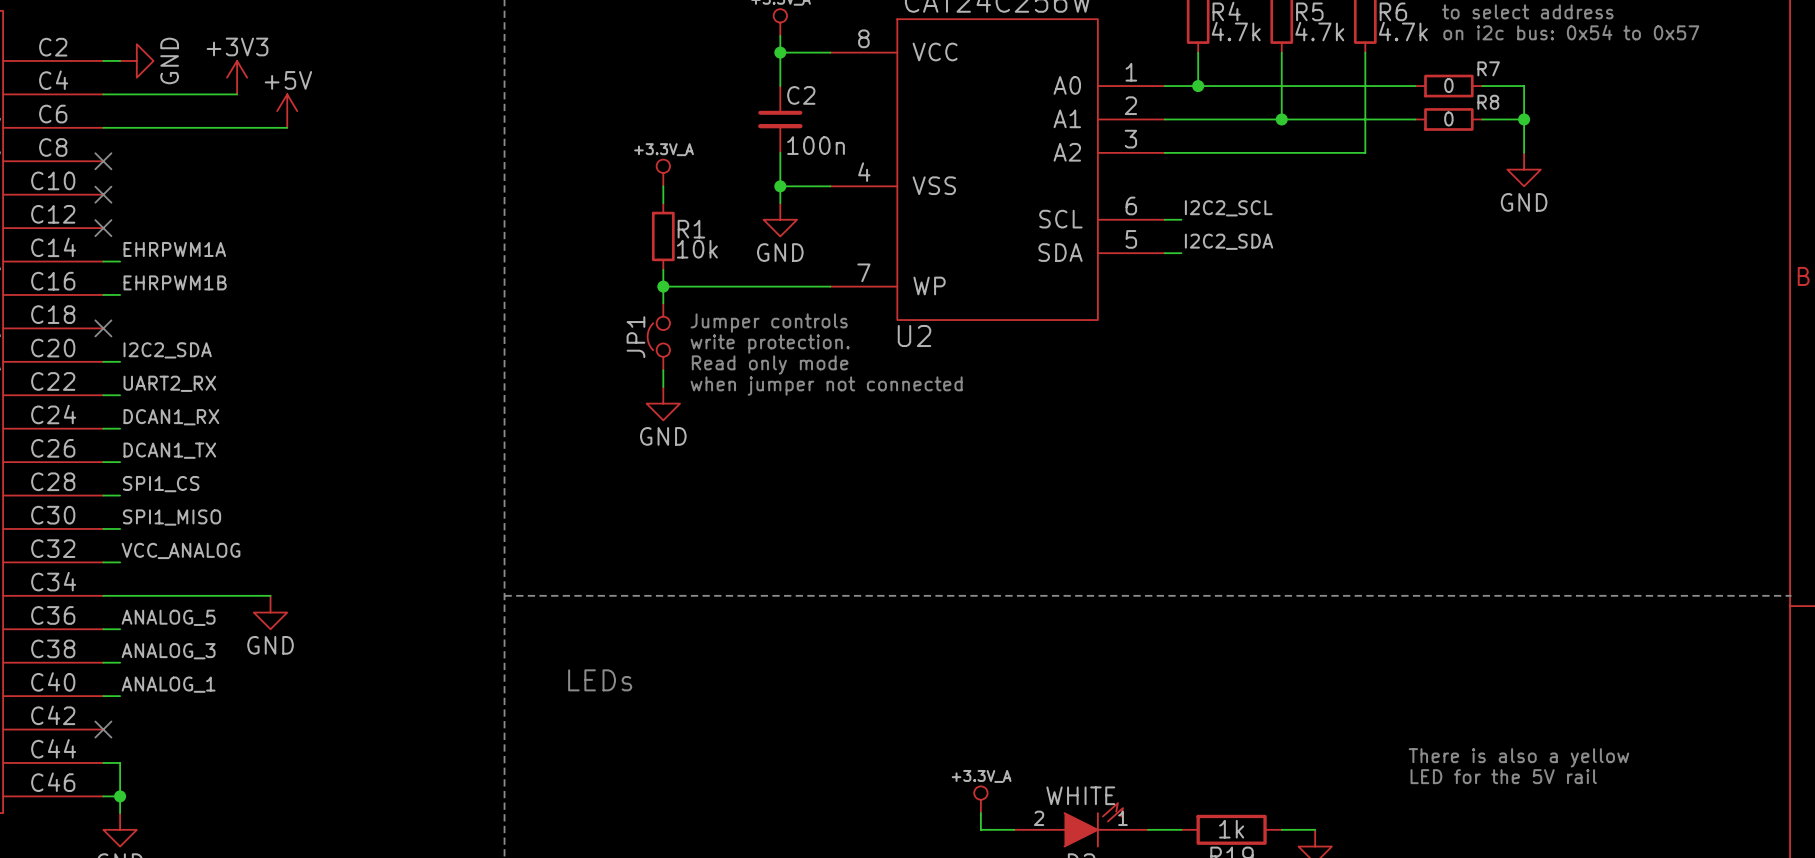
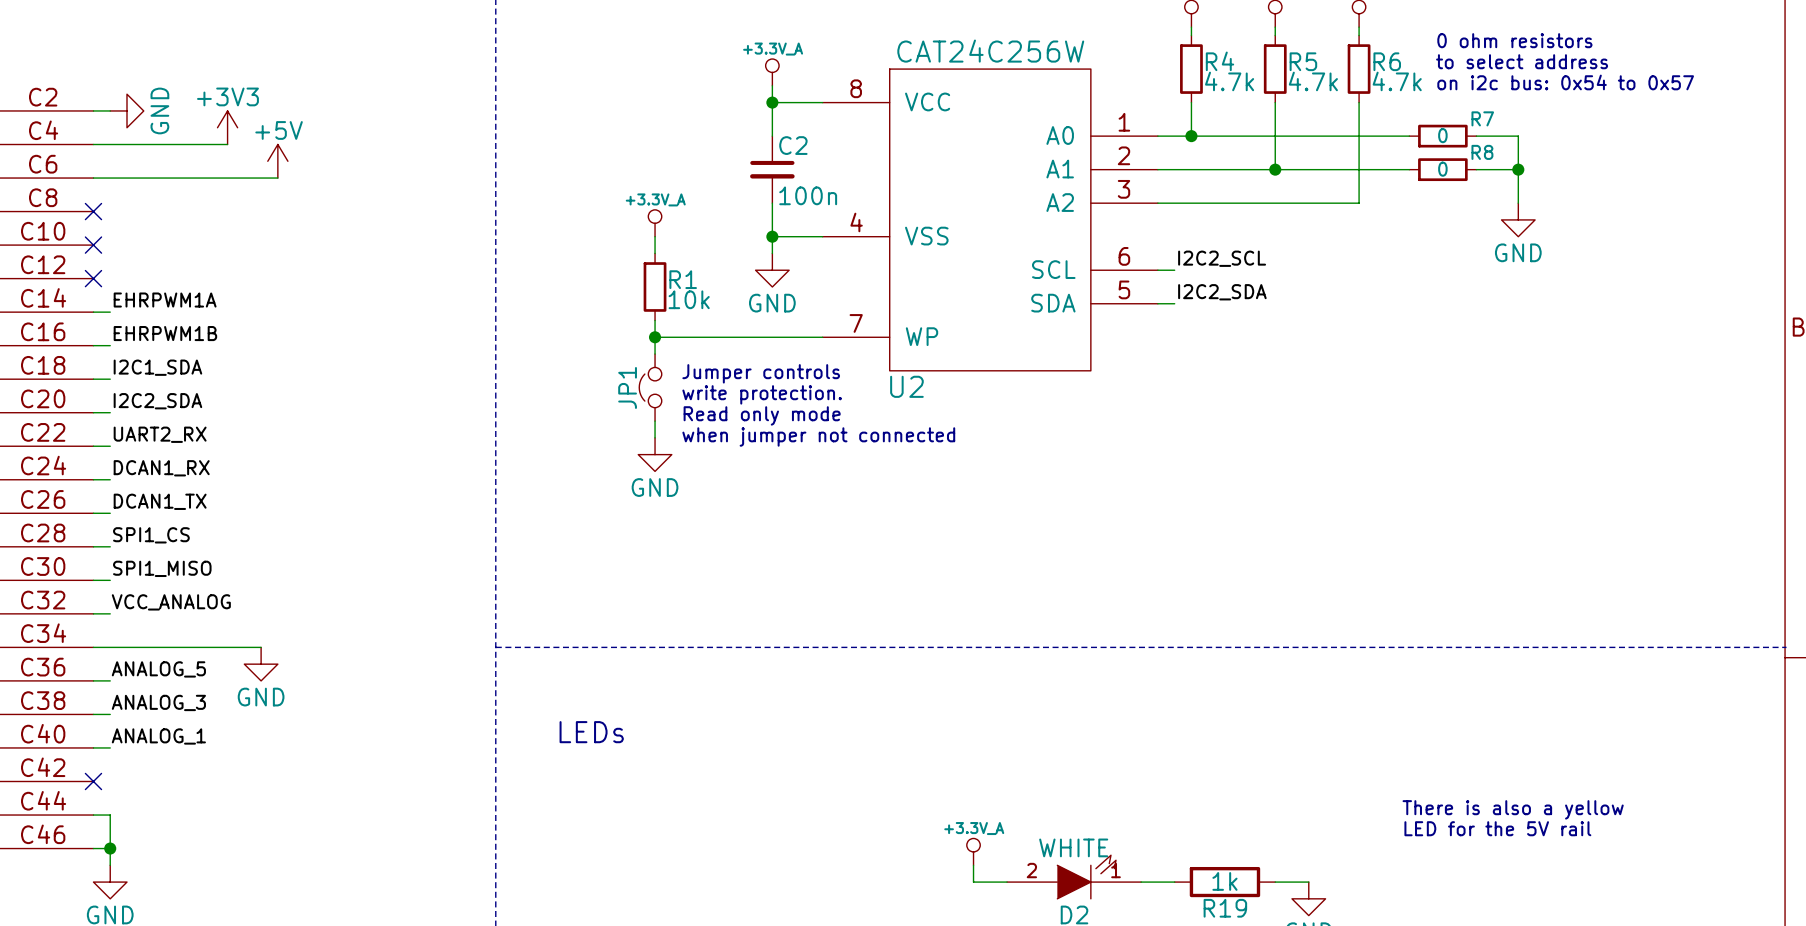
label: none -> I2C1_SDA (157, 367)
wire: none -> (93, 379) (110, 379)
no-connect mark: (103, 328) -> none

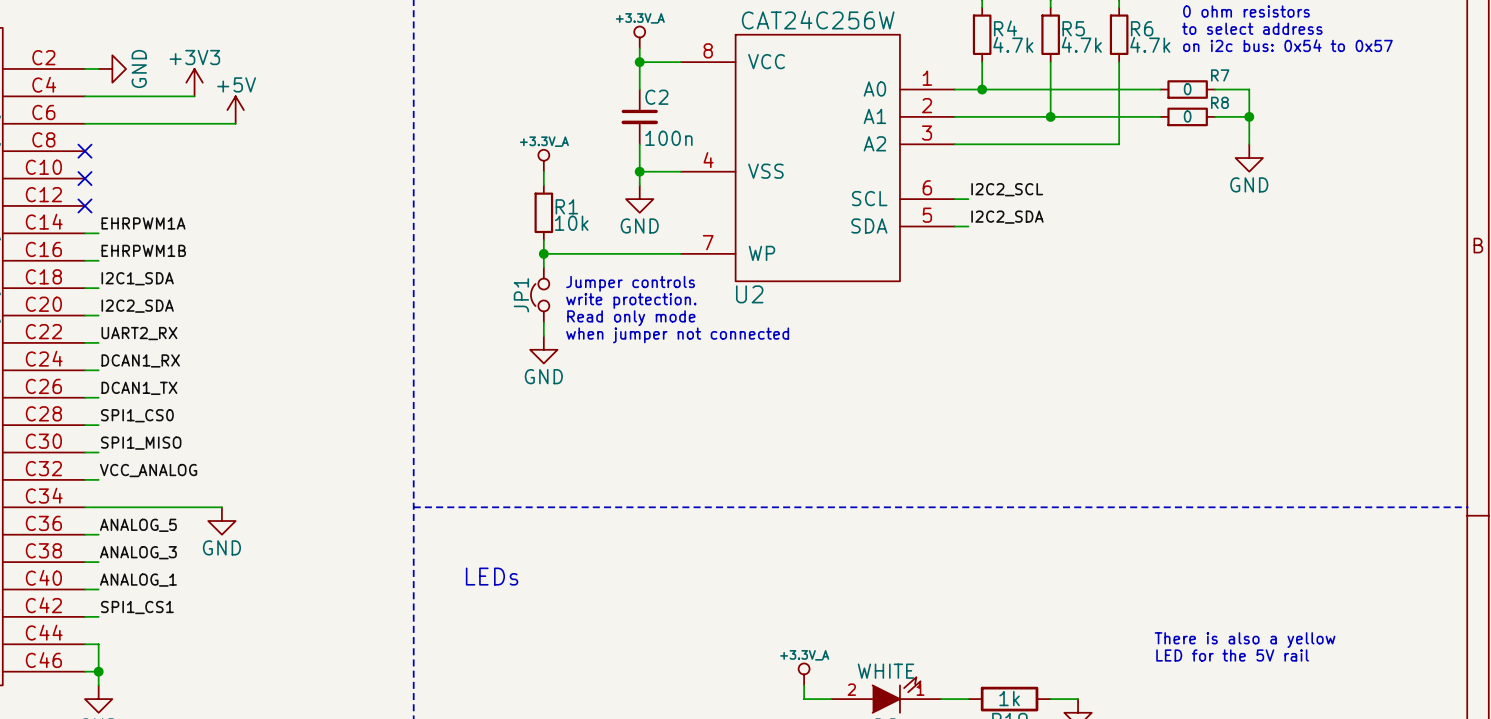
label: SPI1_CS (151, 535) -> SPI1_CS0 (137, 415)
label: none -> SPI1_CS1 (137, 607)
wire: none -> (84, 616) (98, 616)
no-connect mark: (93, 781) -> none

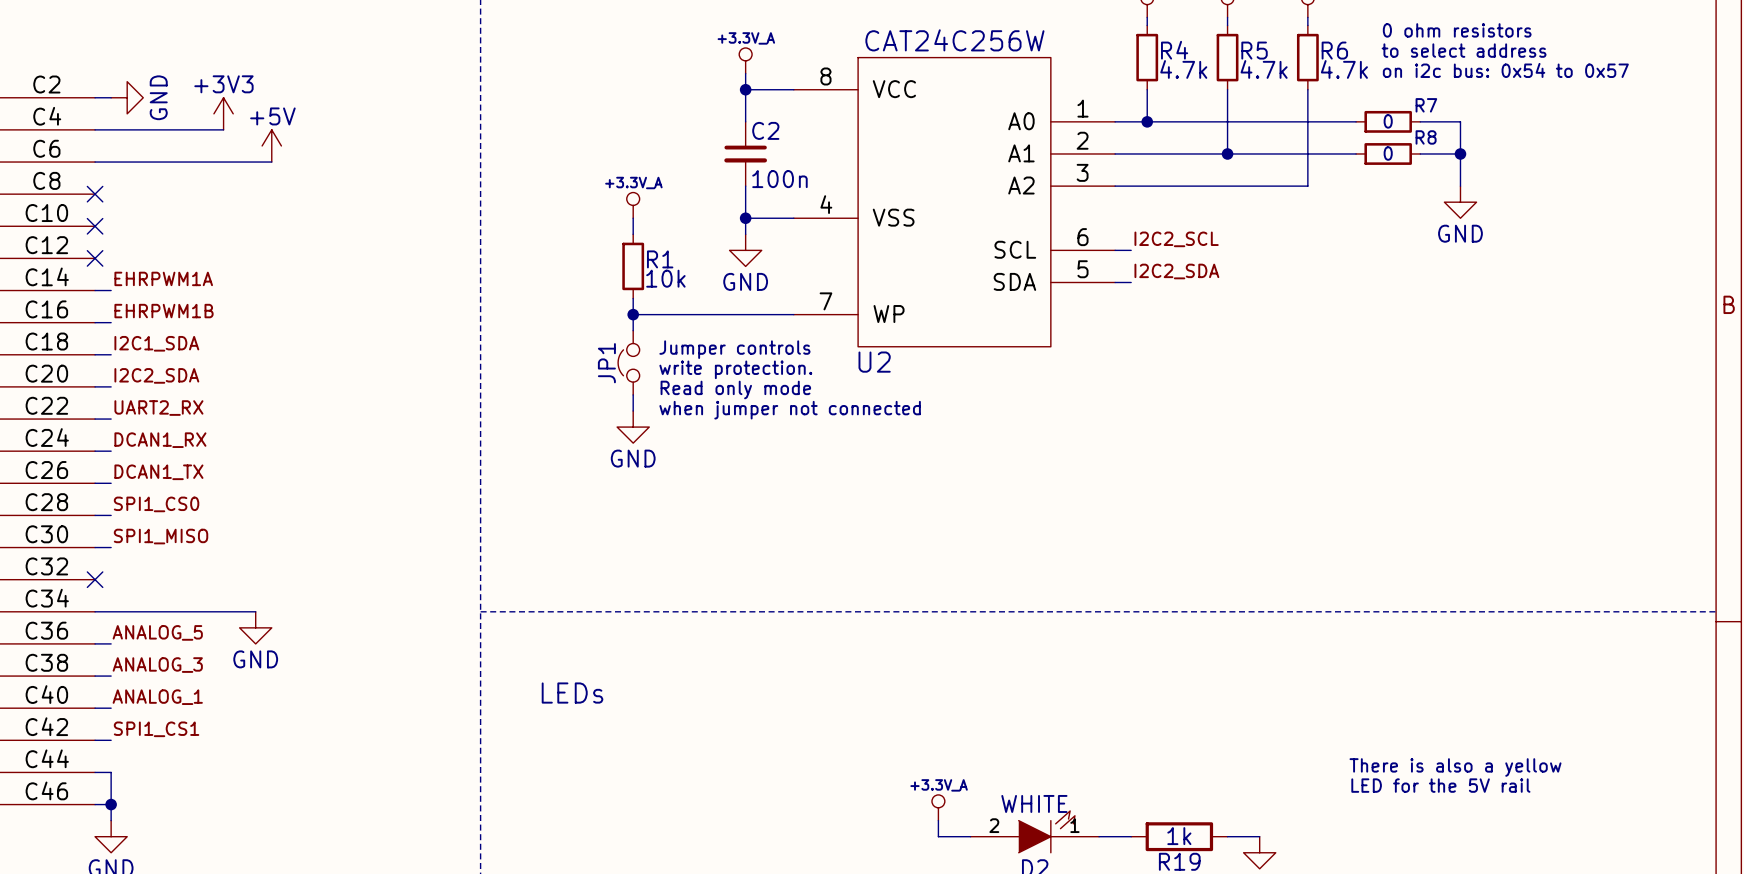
label: VCC_ANALOG (148, 470) -> none
wire: (84, 479) (98, 479) -> none
no-connect mark: none -> (95, 579)

